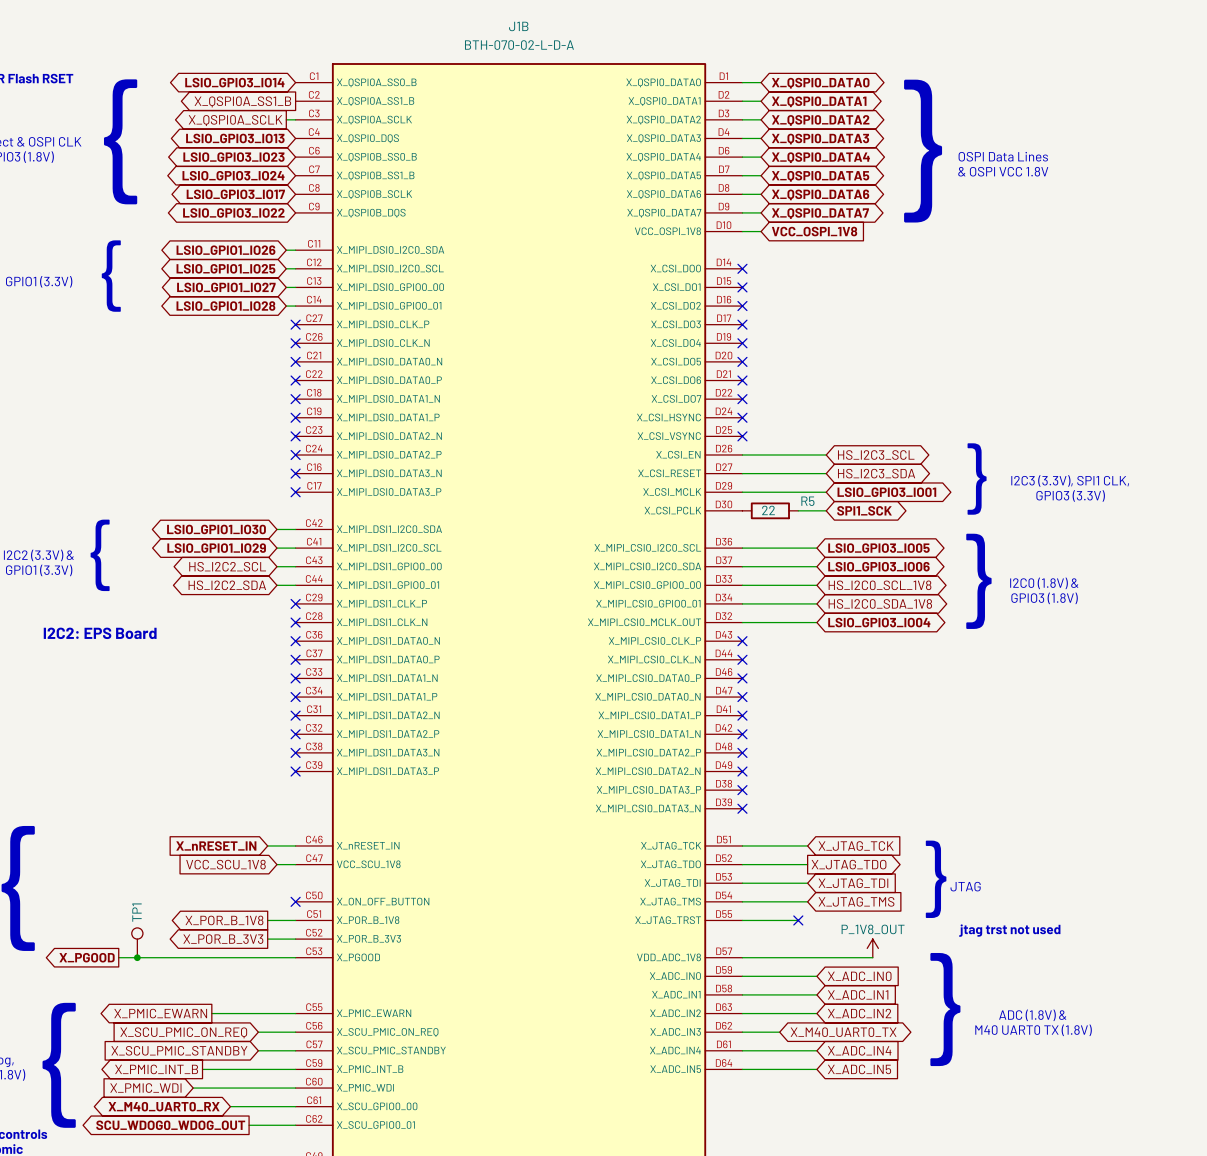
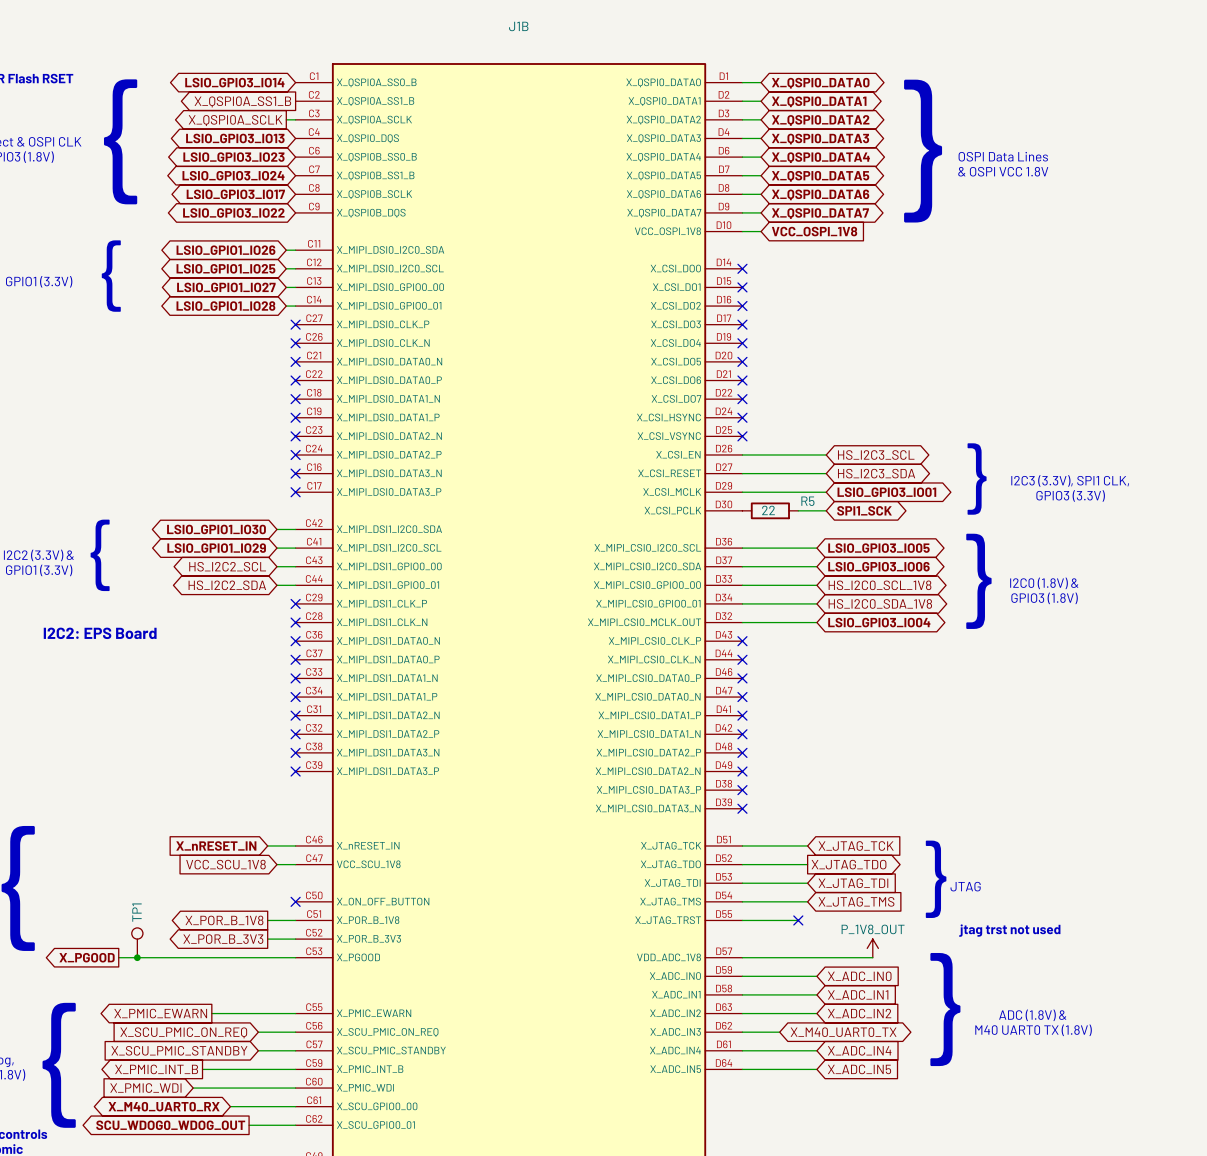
J1B value: BTH-070-02-L-D-A (519, 45) -> none

